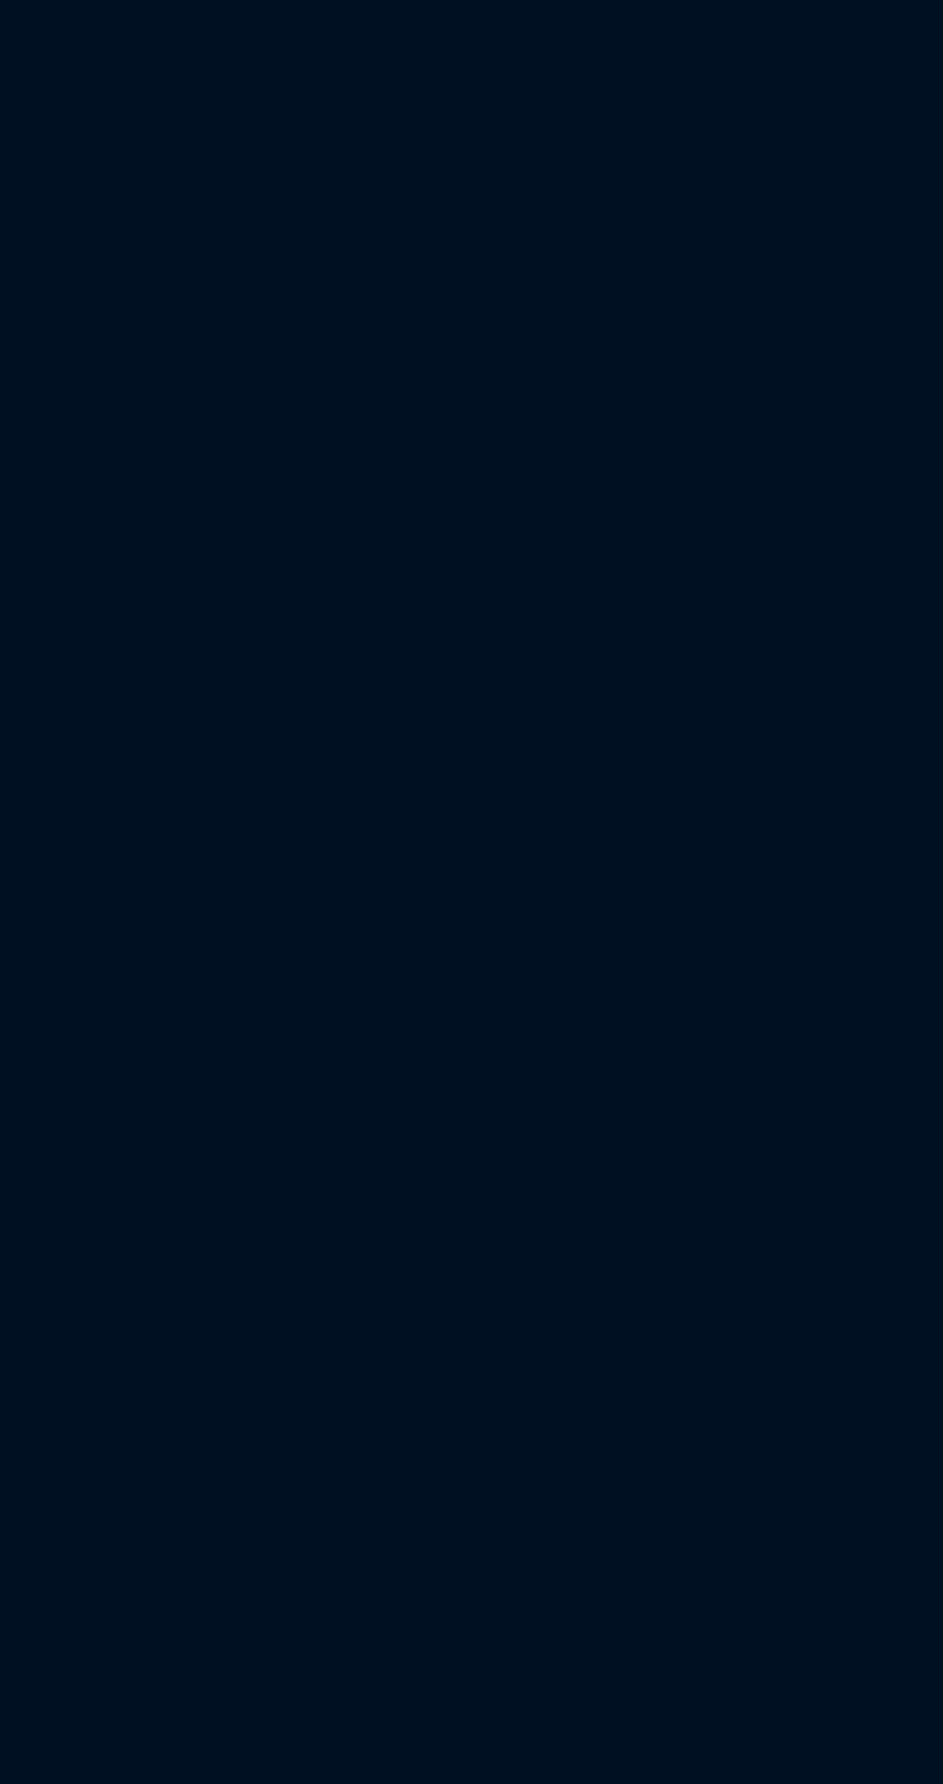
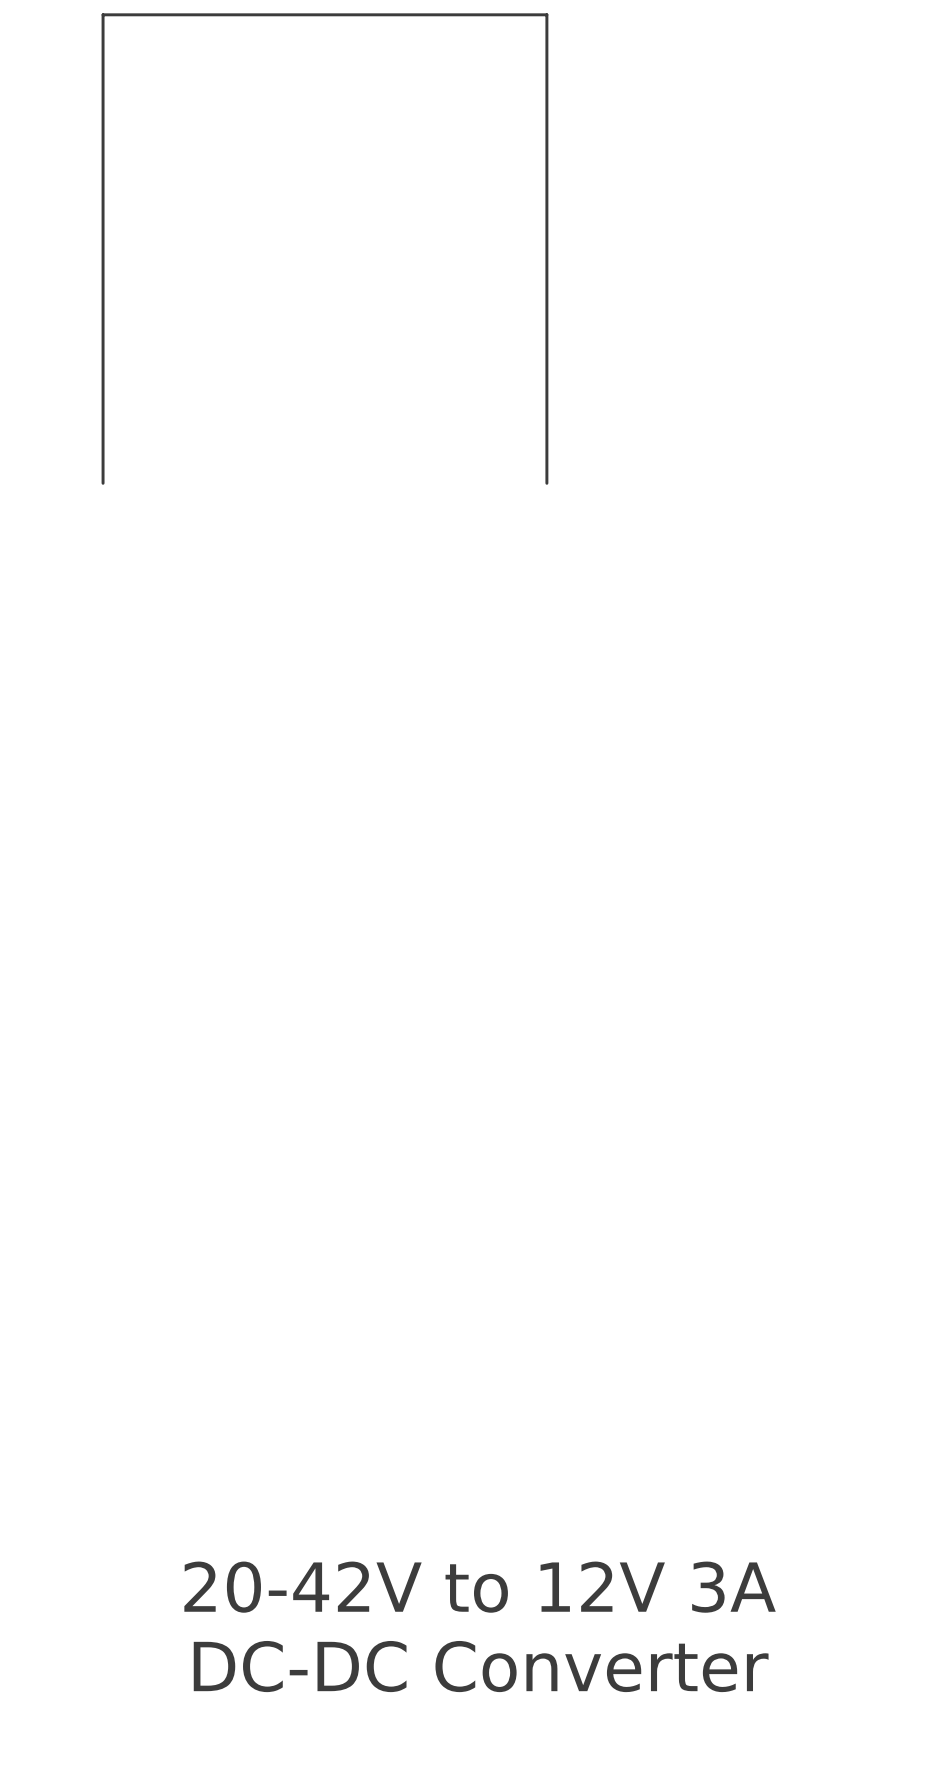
line: none -> (546, 483) (546, 14) (103, 14) (103, 483)
text: none -> 20-42V to 12V 3A (480, 1587)
text: none -> DC-DC Converter (481, 1666)

